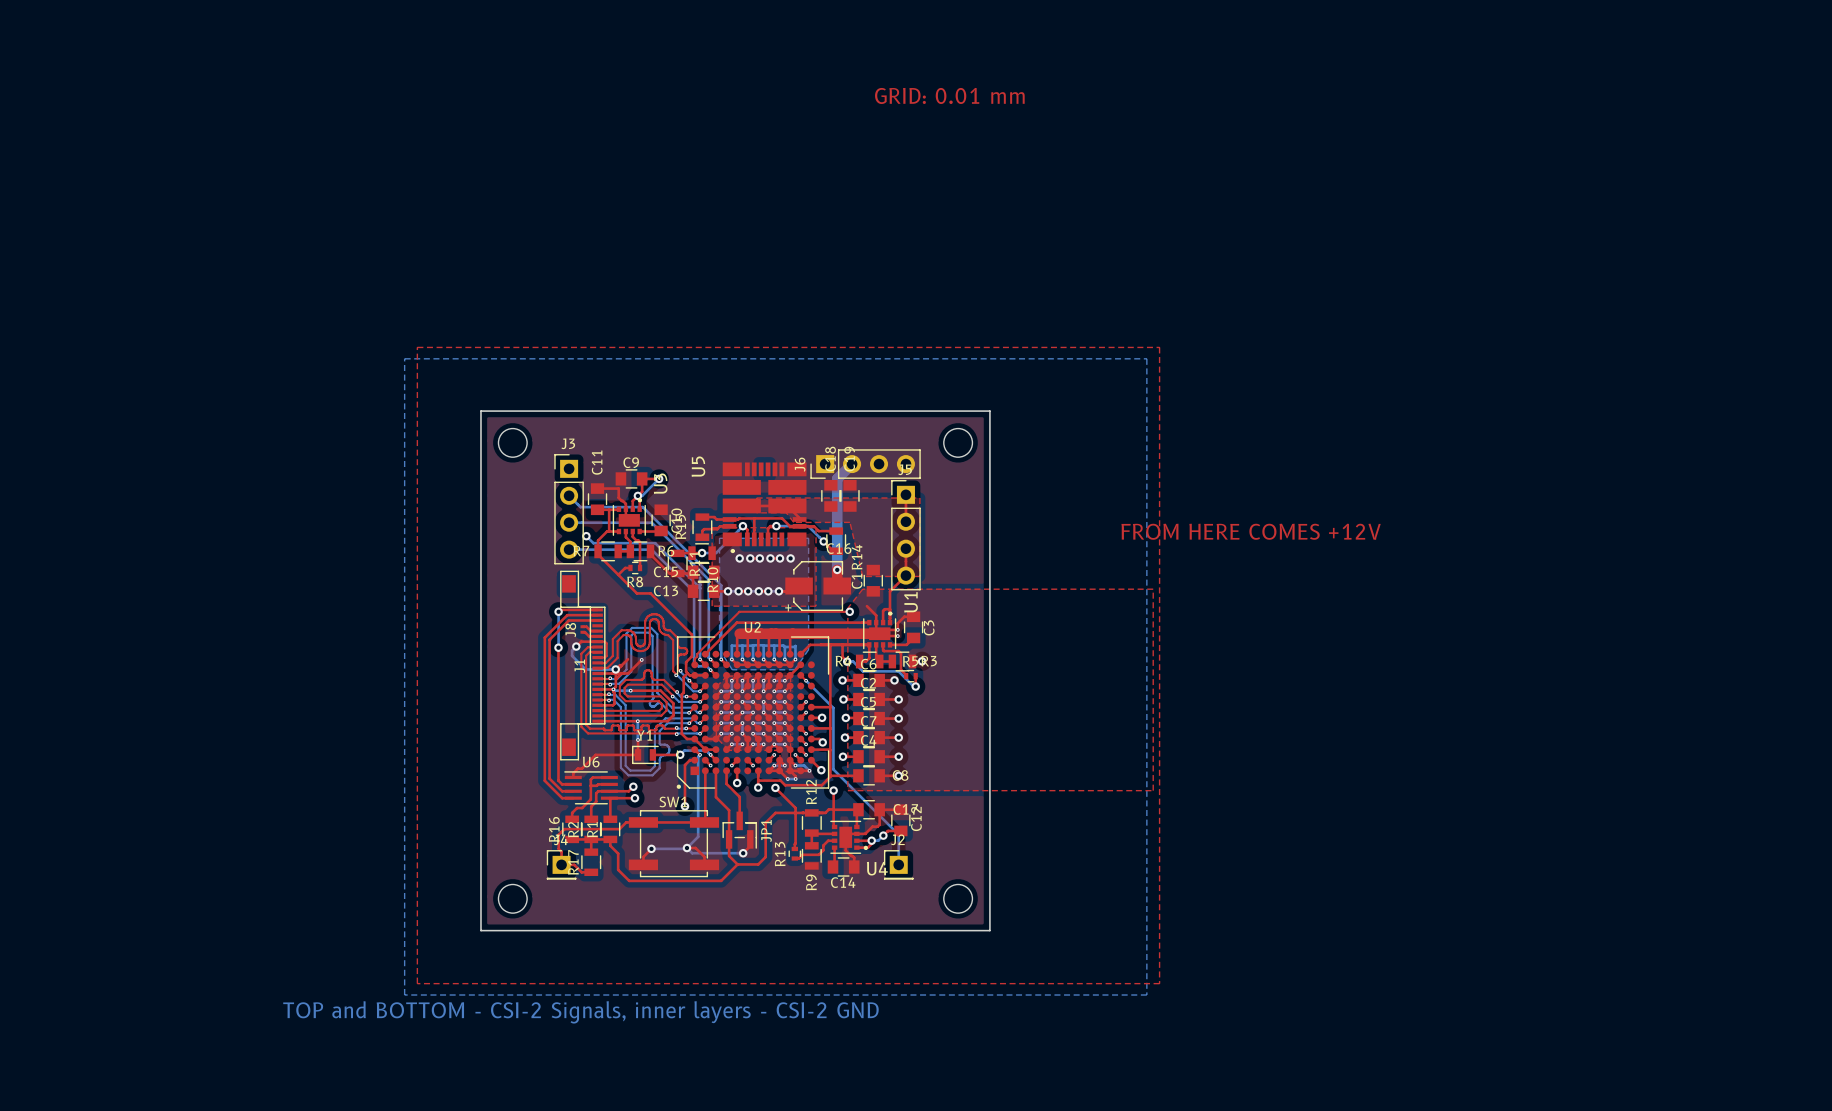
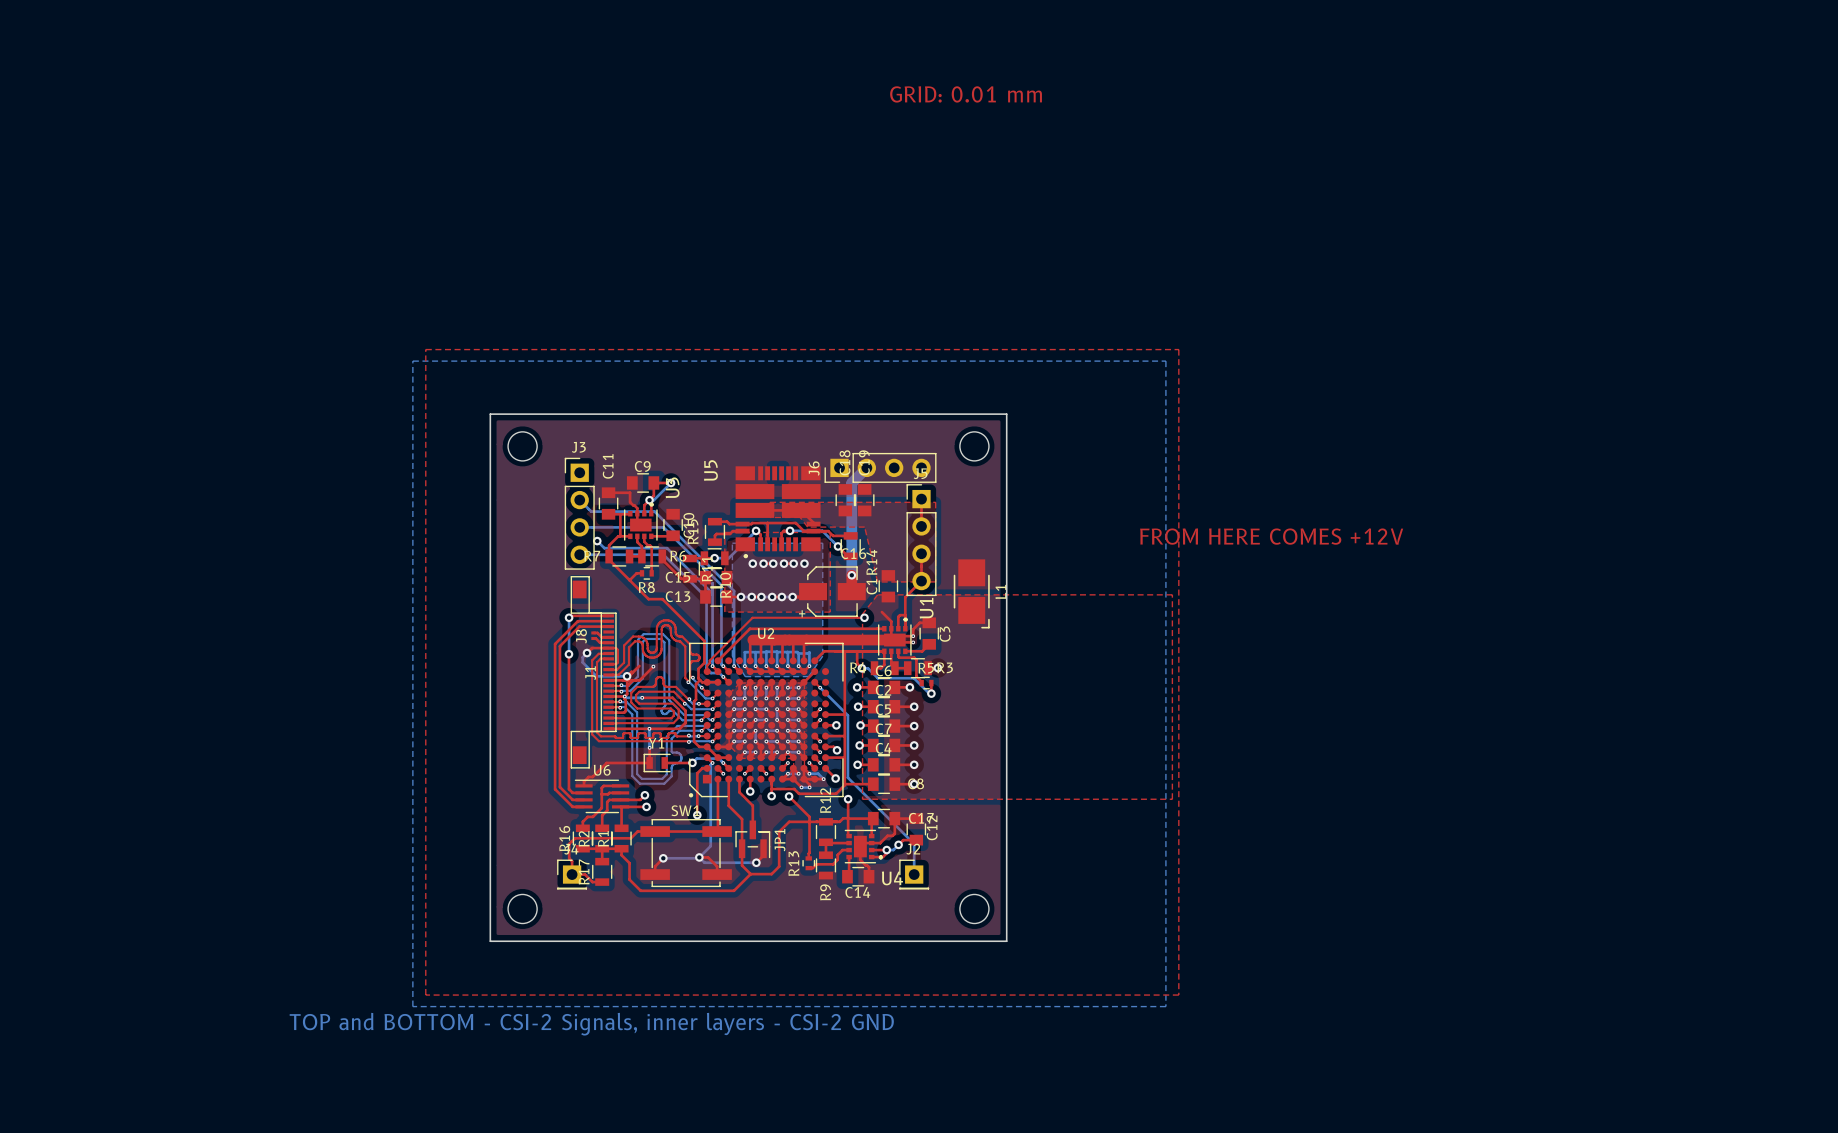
L1: none -> (971, 593)

